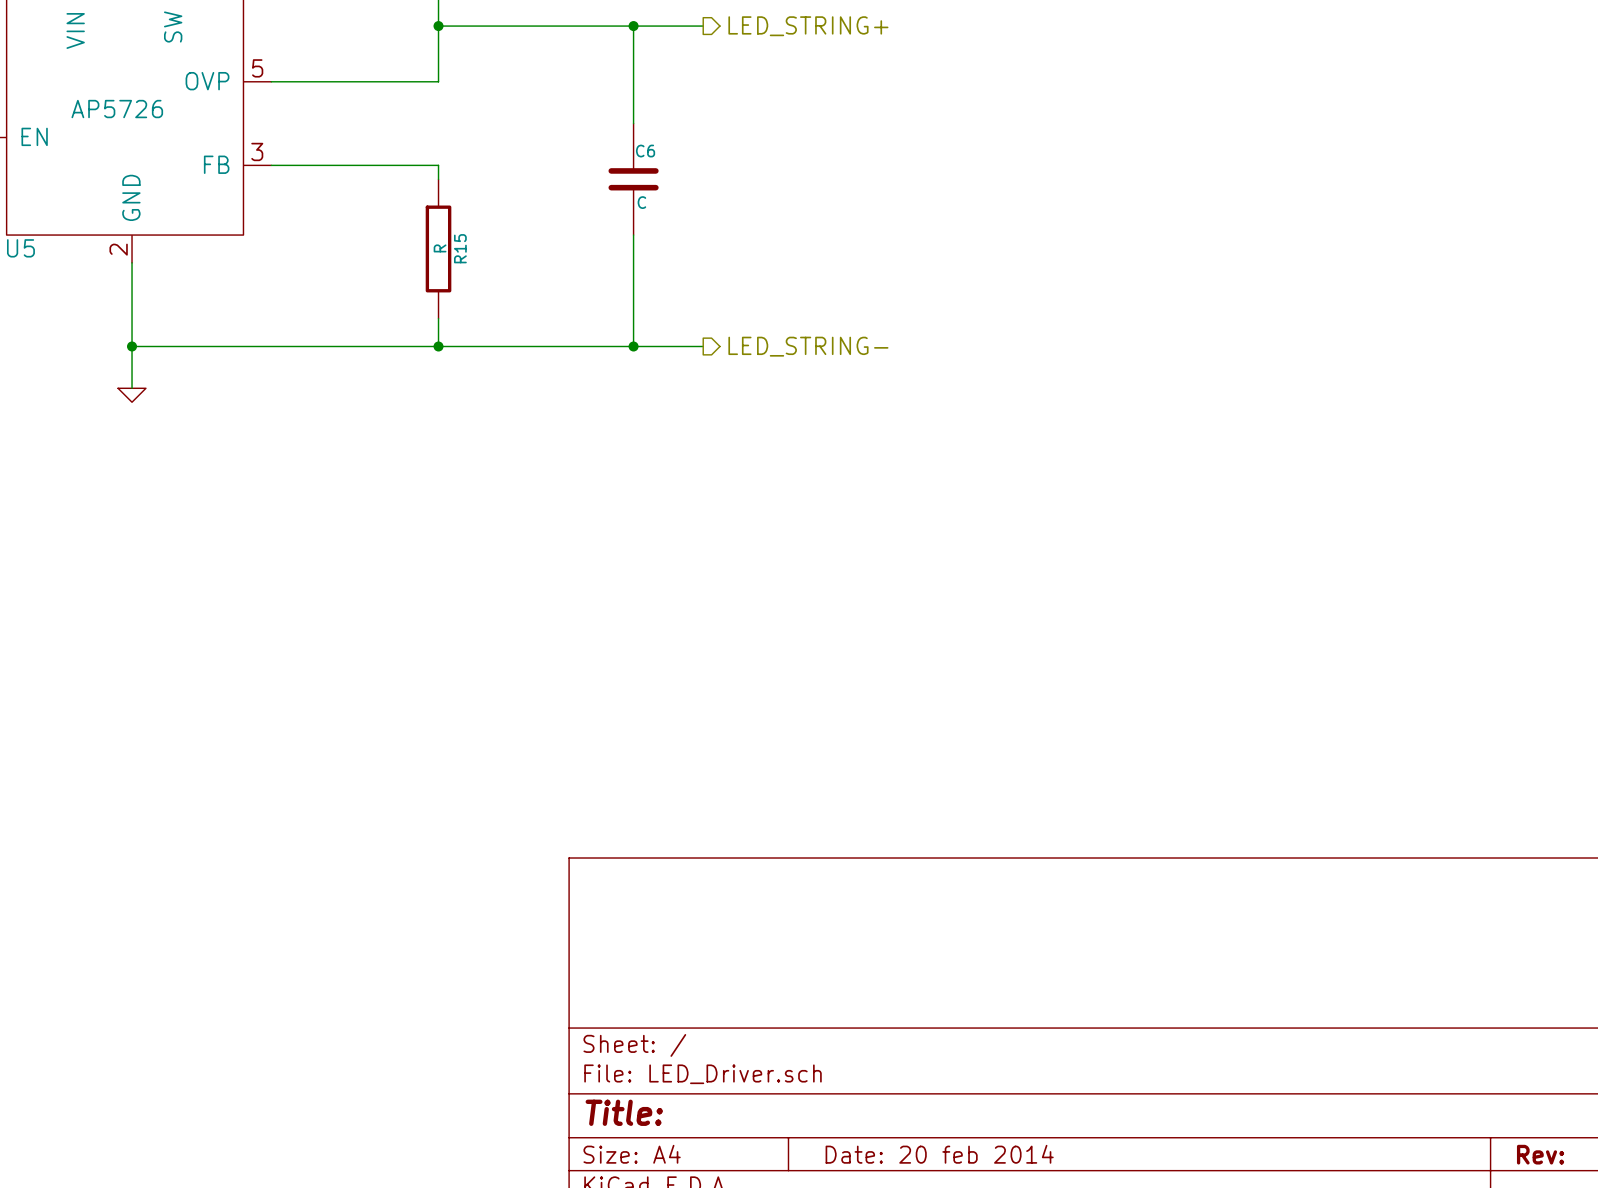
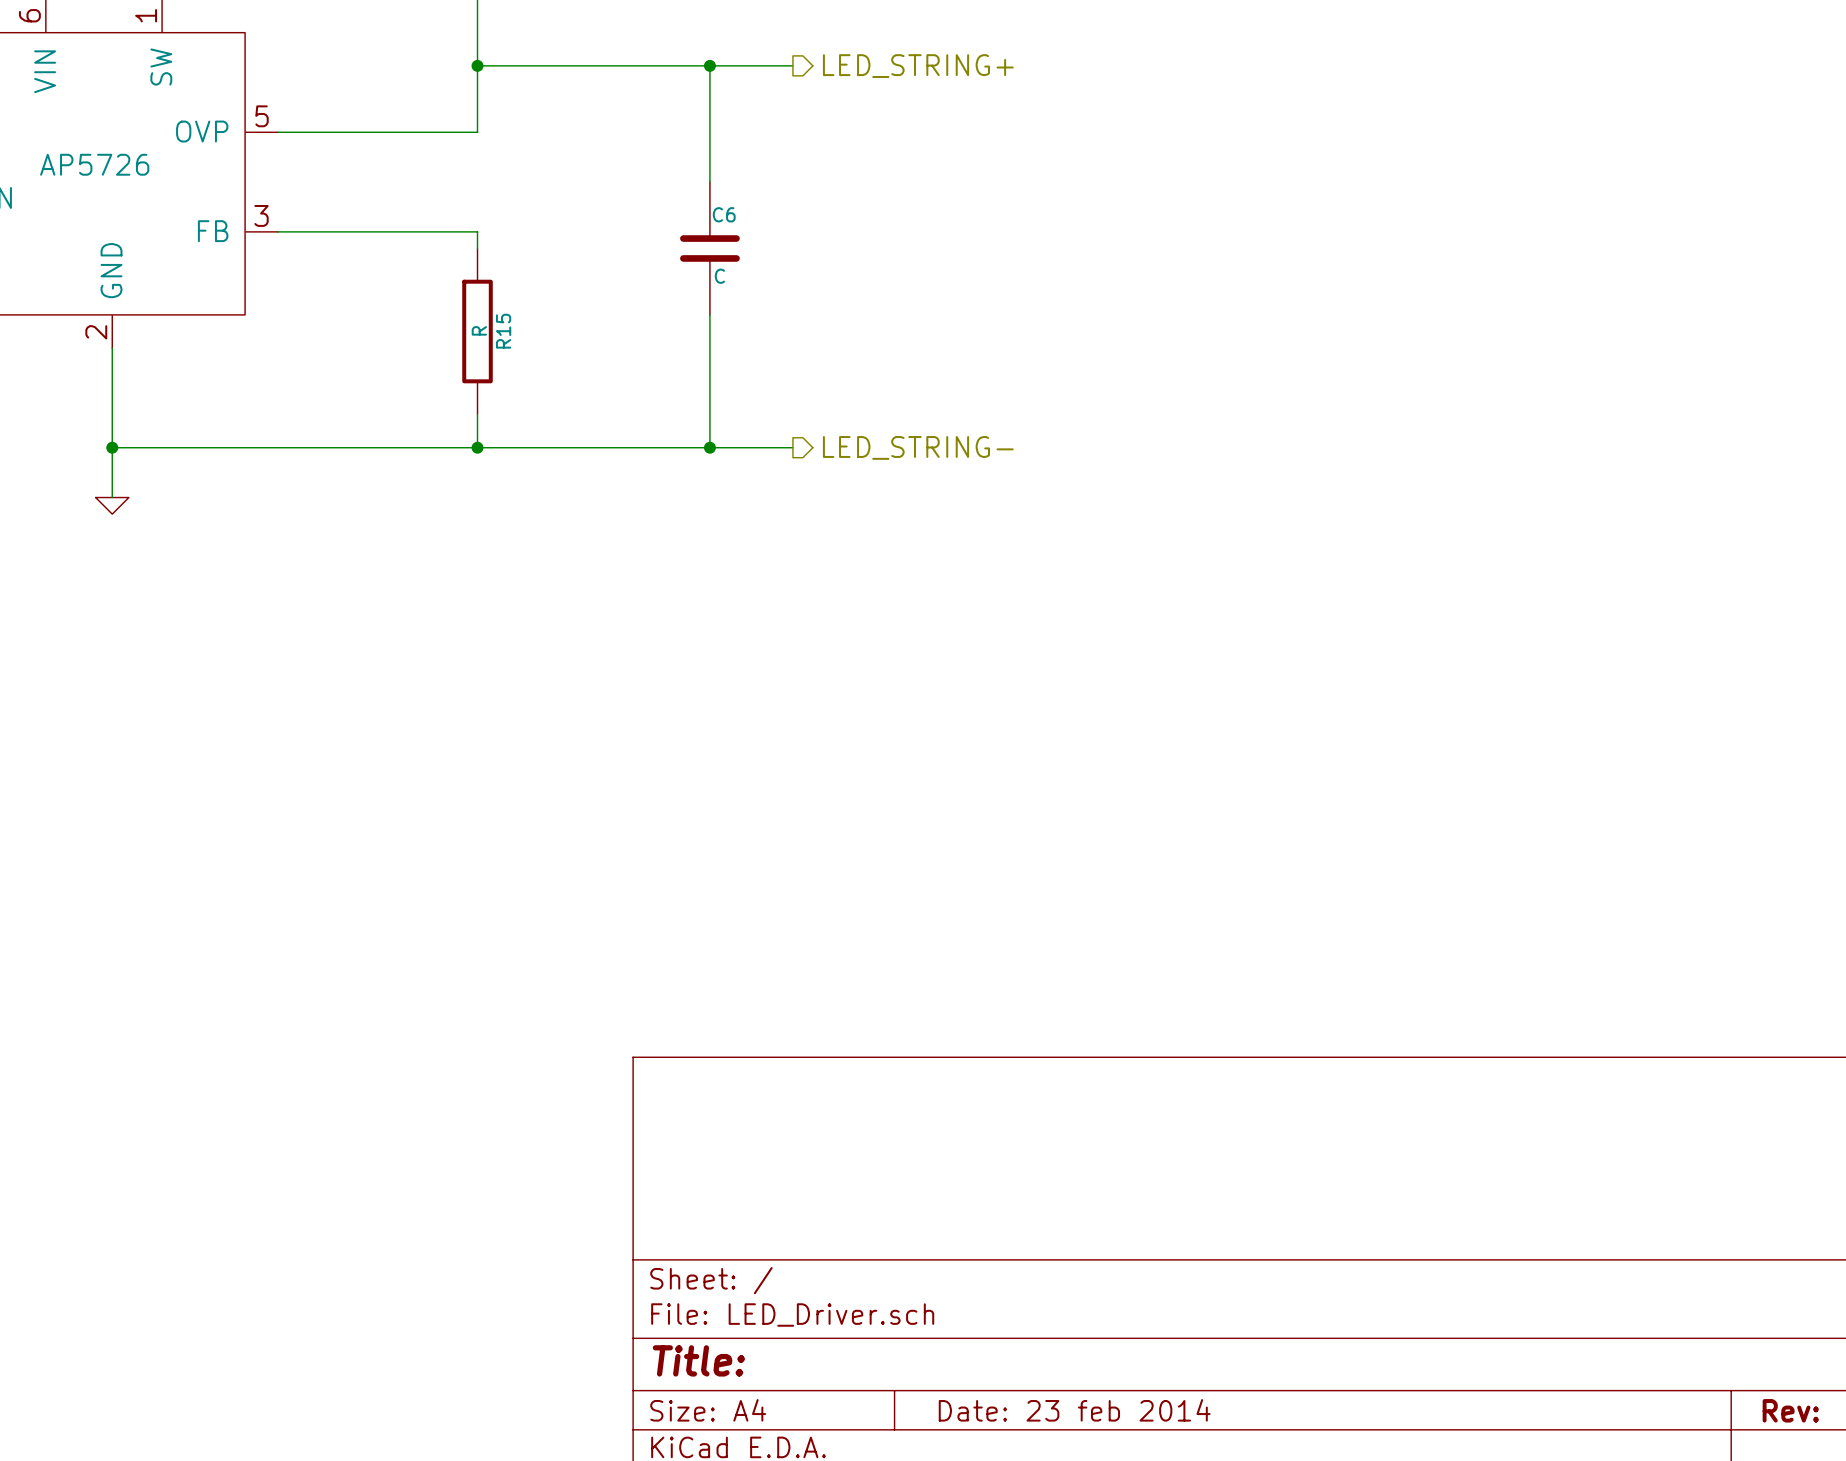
title block: Date: 20 feb 2014 (939, 1154) -> Date: 23 feb 2014 (1074, 1410)

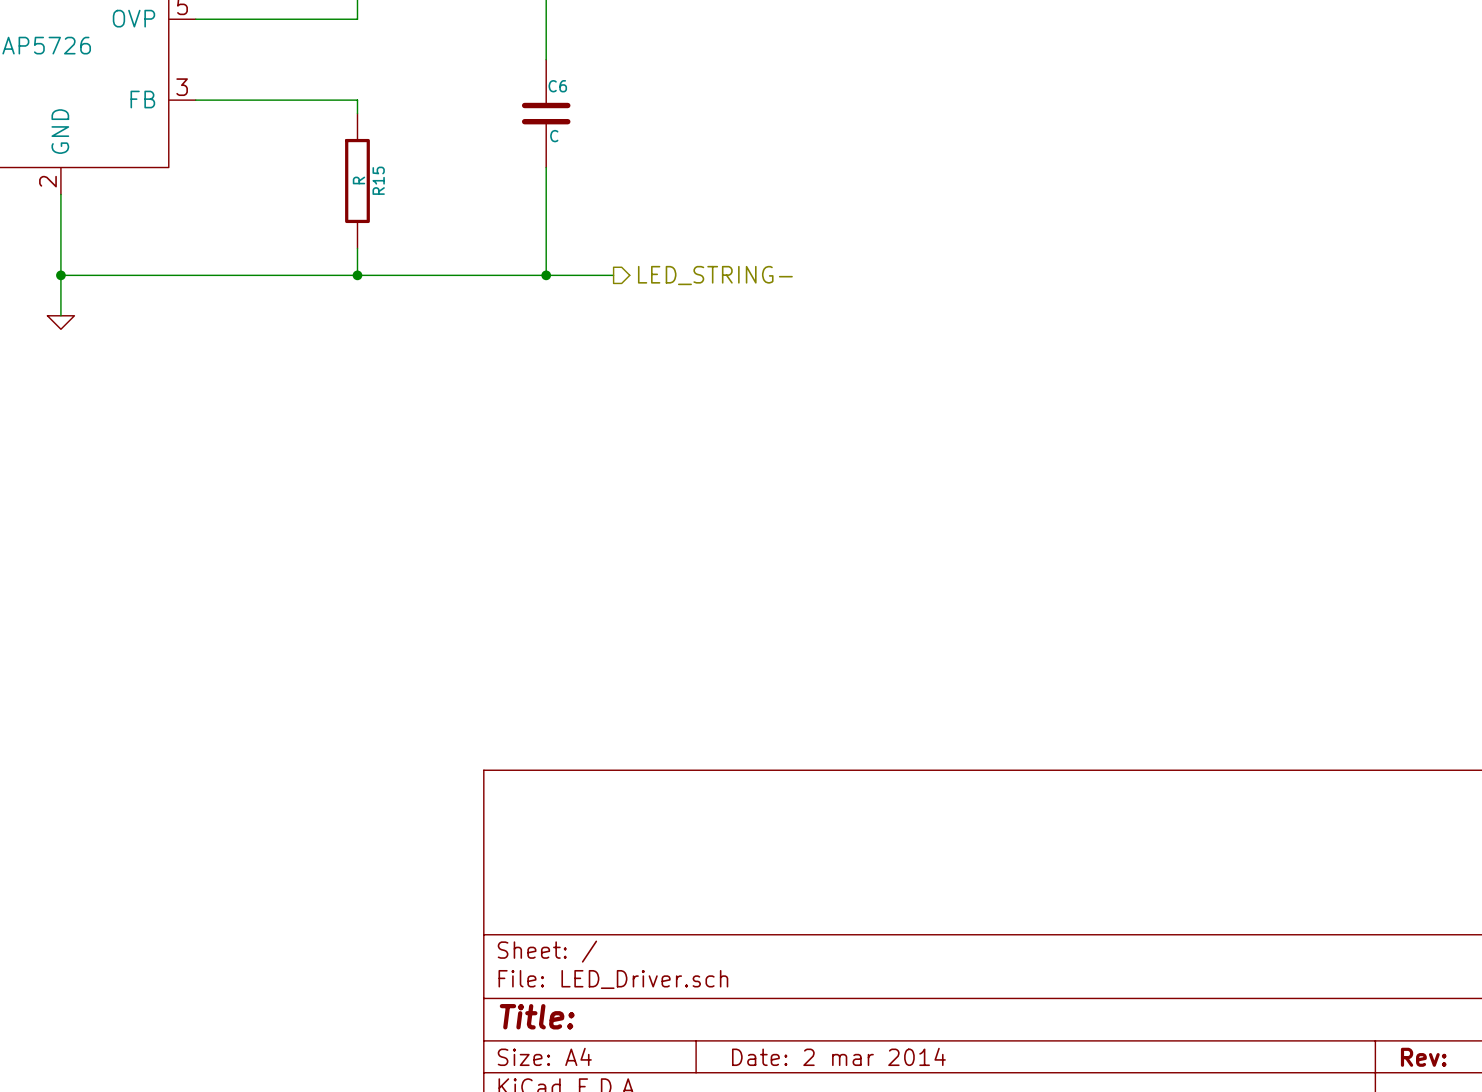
title block: Date: 23 feb 2014 (1074, 1410) -> Date: 2 mar 2014 (838, 1056)

